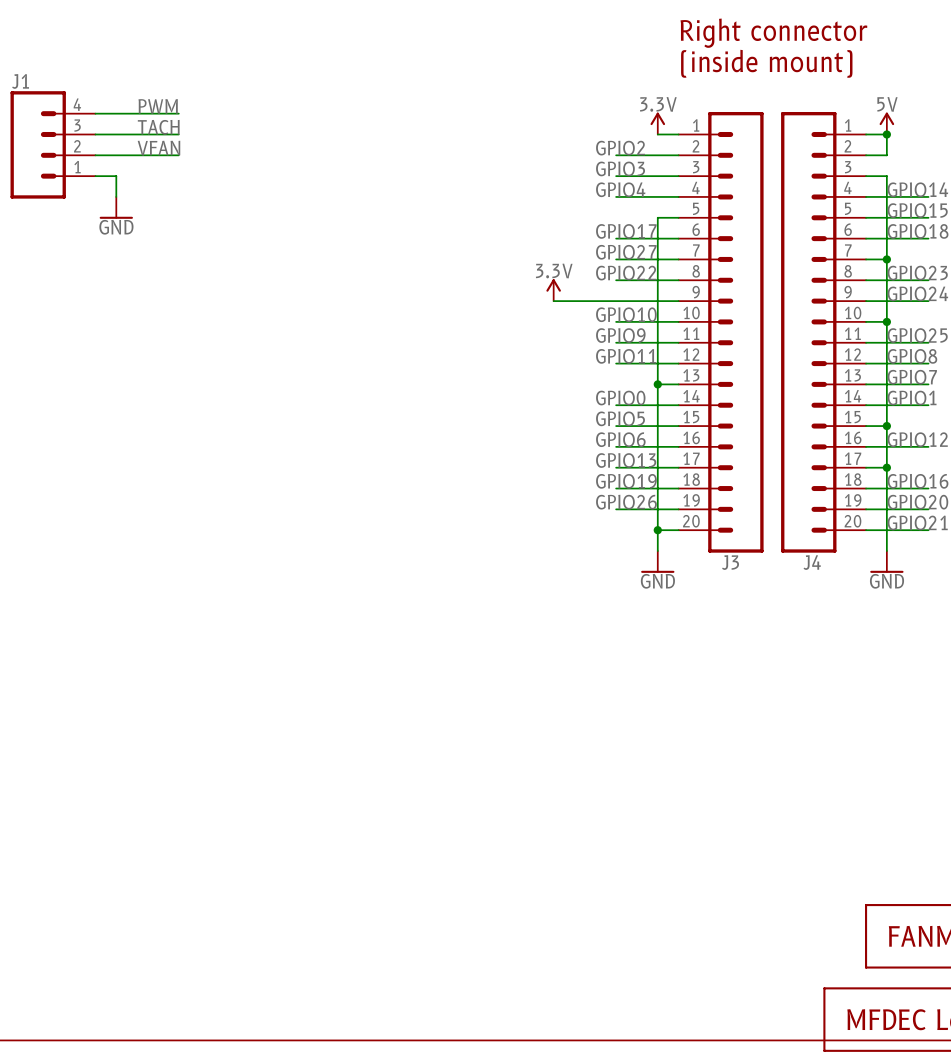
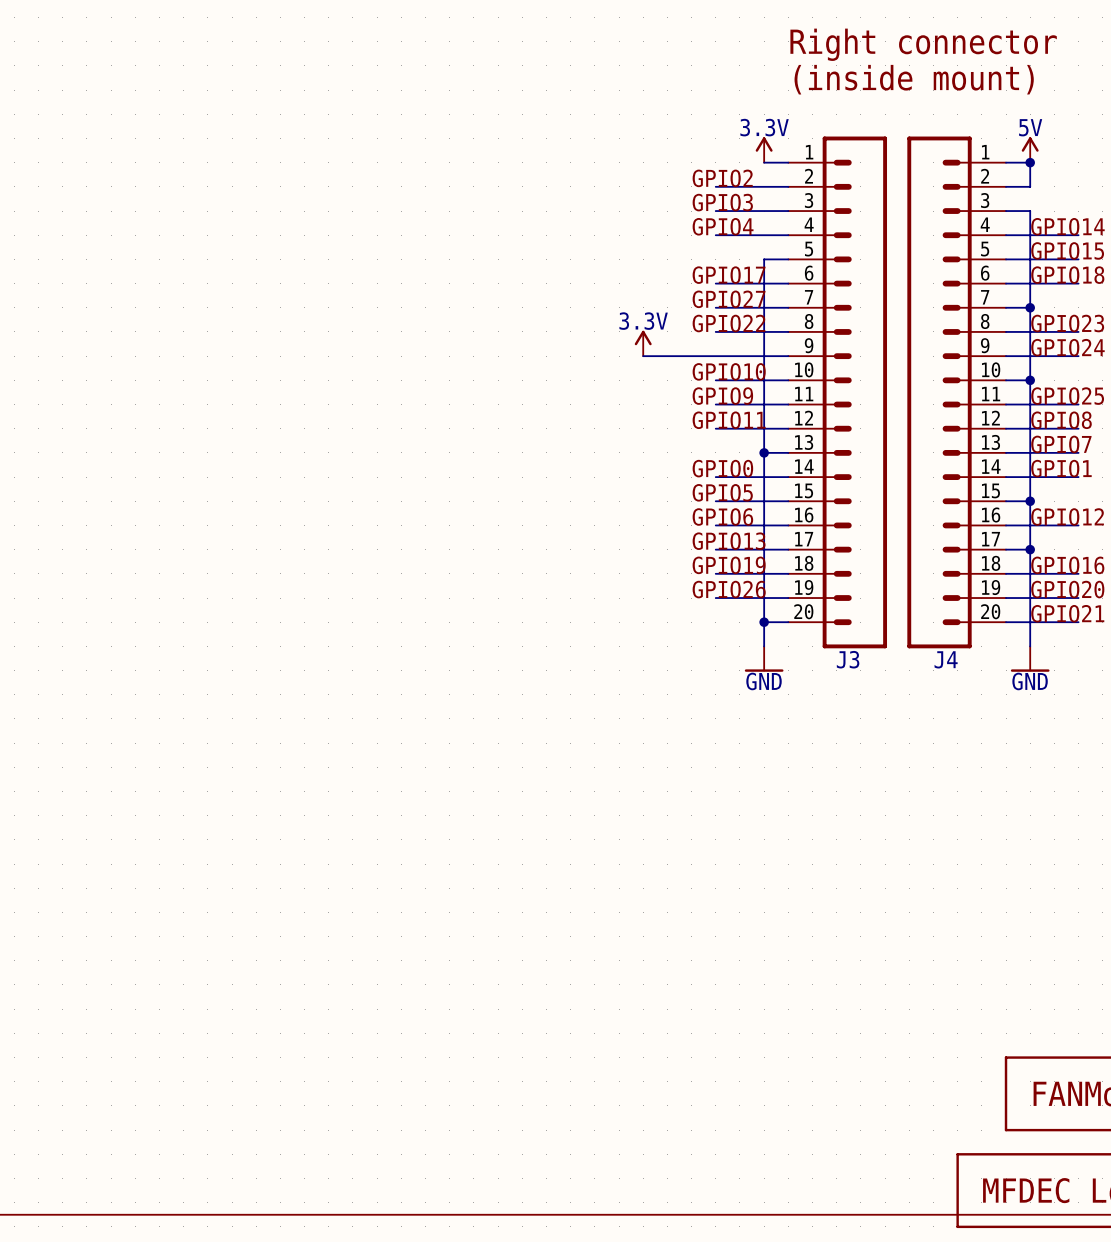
label: PWM (158, 106) -> none
wire: (95, 113) (178, 113) -> none
label: TACH (158, 127) -> none
wire: (95, 134) (178, 134) -> none
J1: (52, 144) -> none
label: VFAN (158, 148) -> none
wire: (95, 155) (178, 155) -> none
wire: (95, 176) (116, 176) (116, 196) -> none
power symbol: GND (116, 207) -> none

